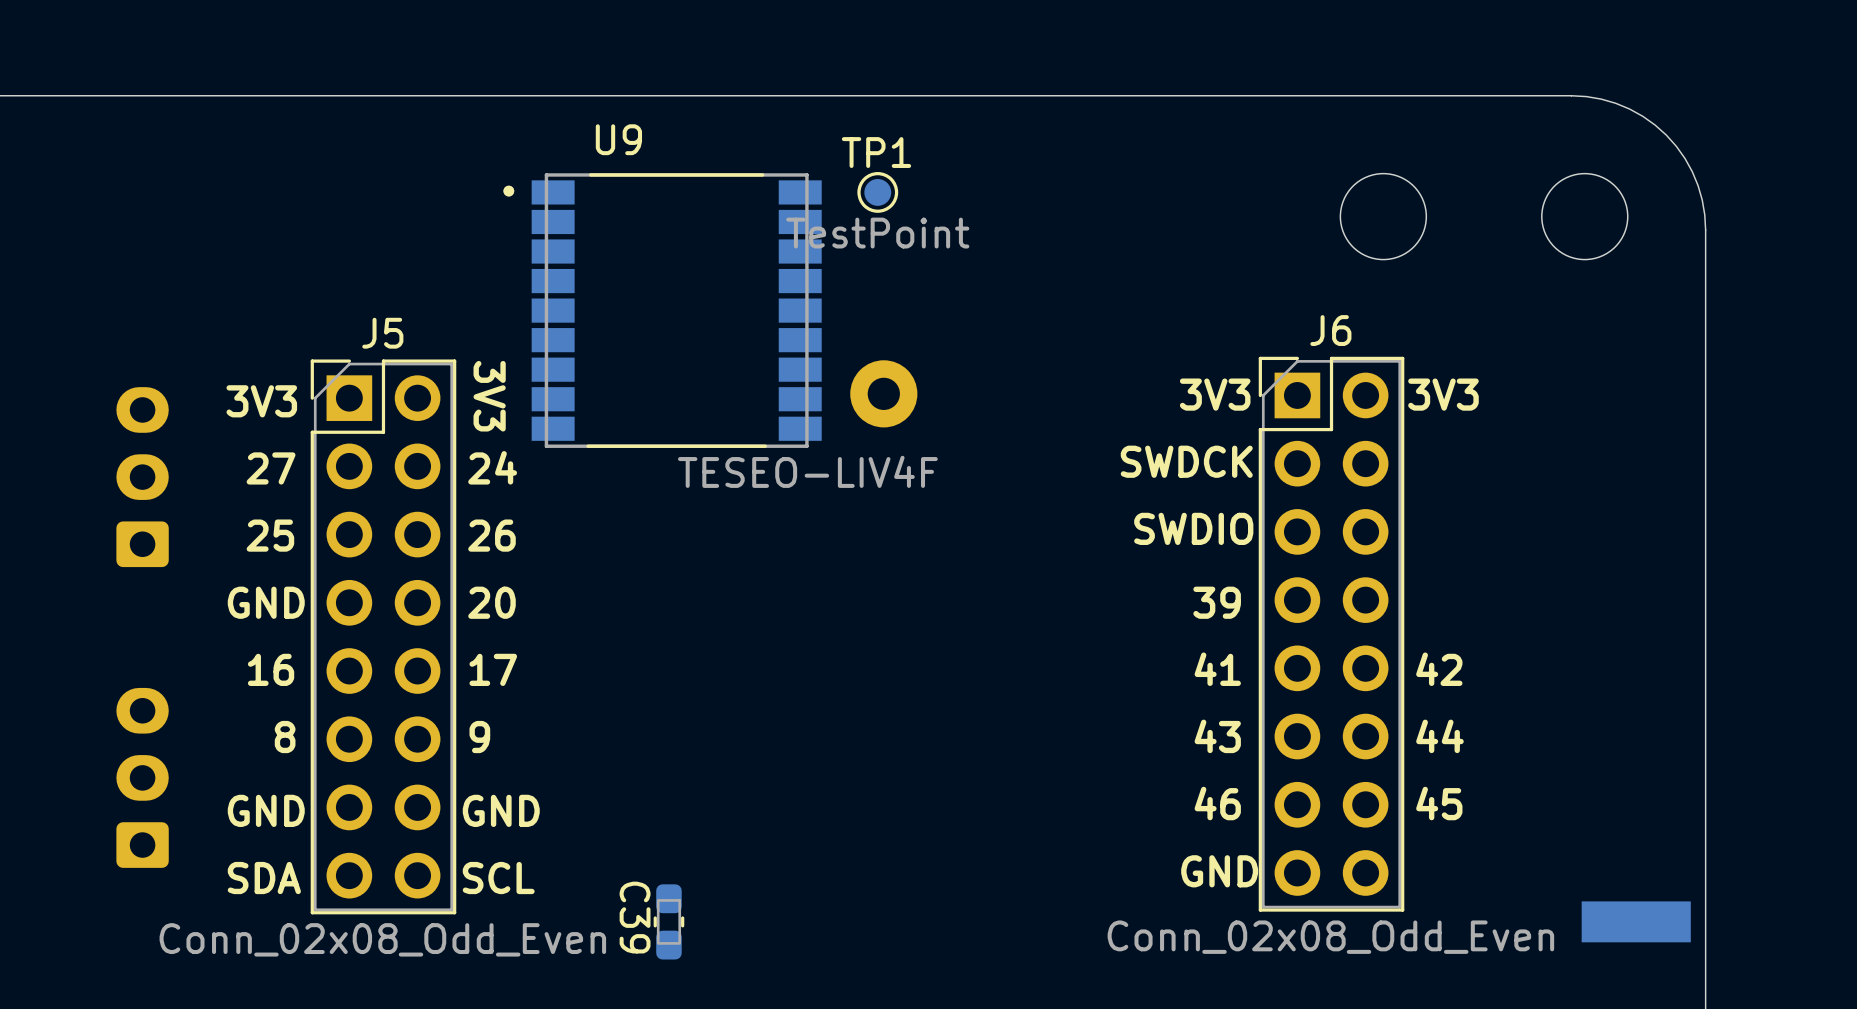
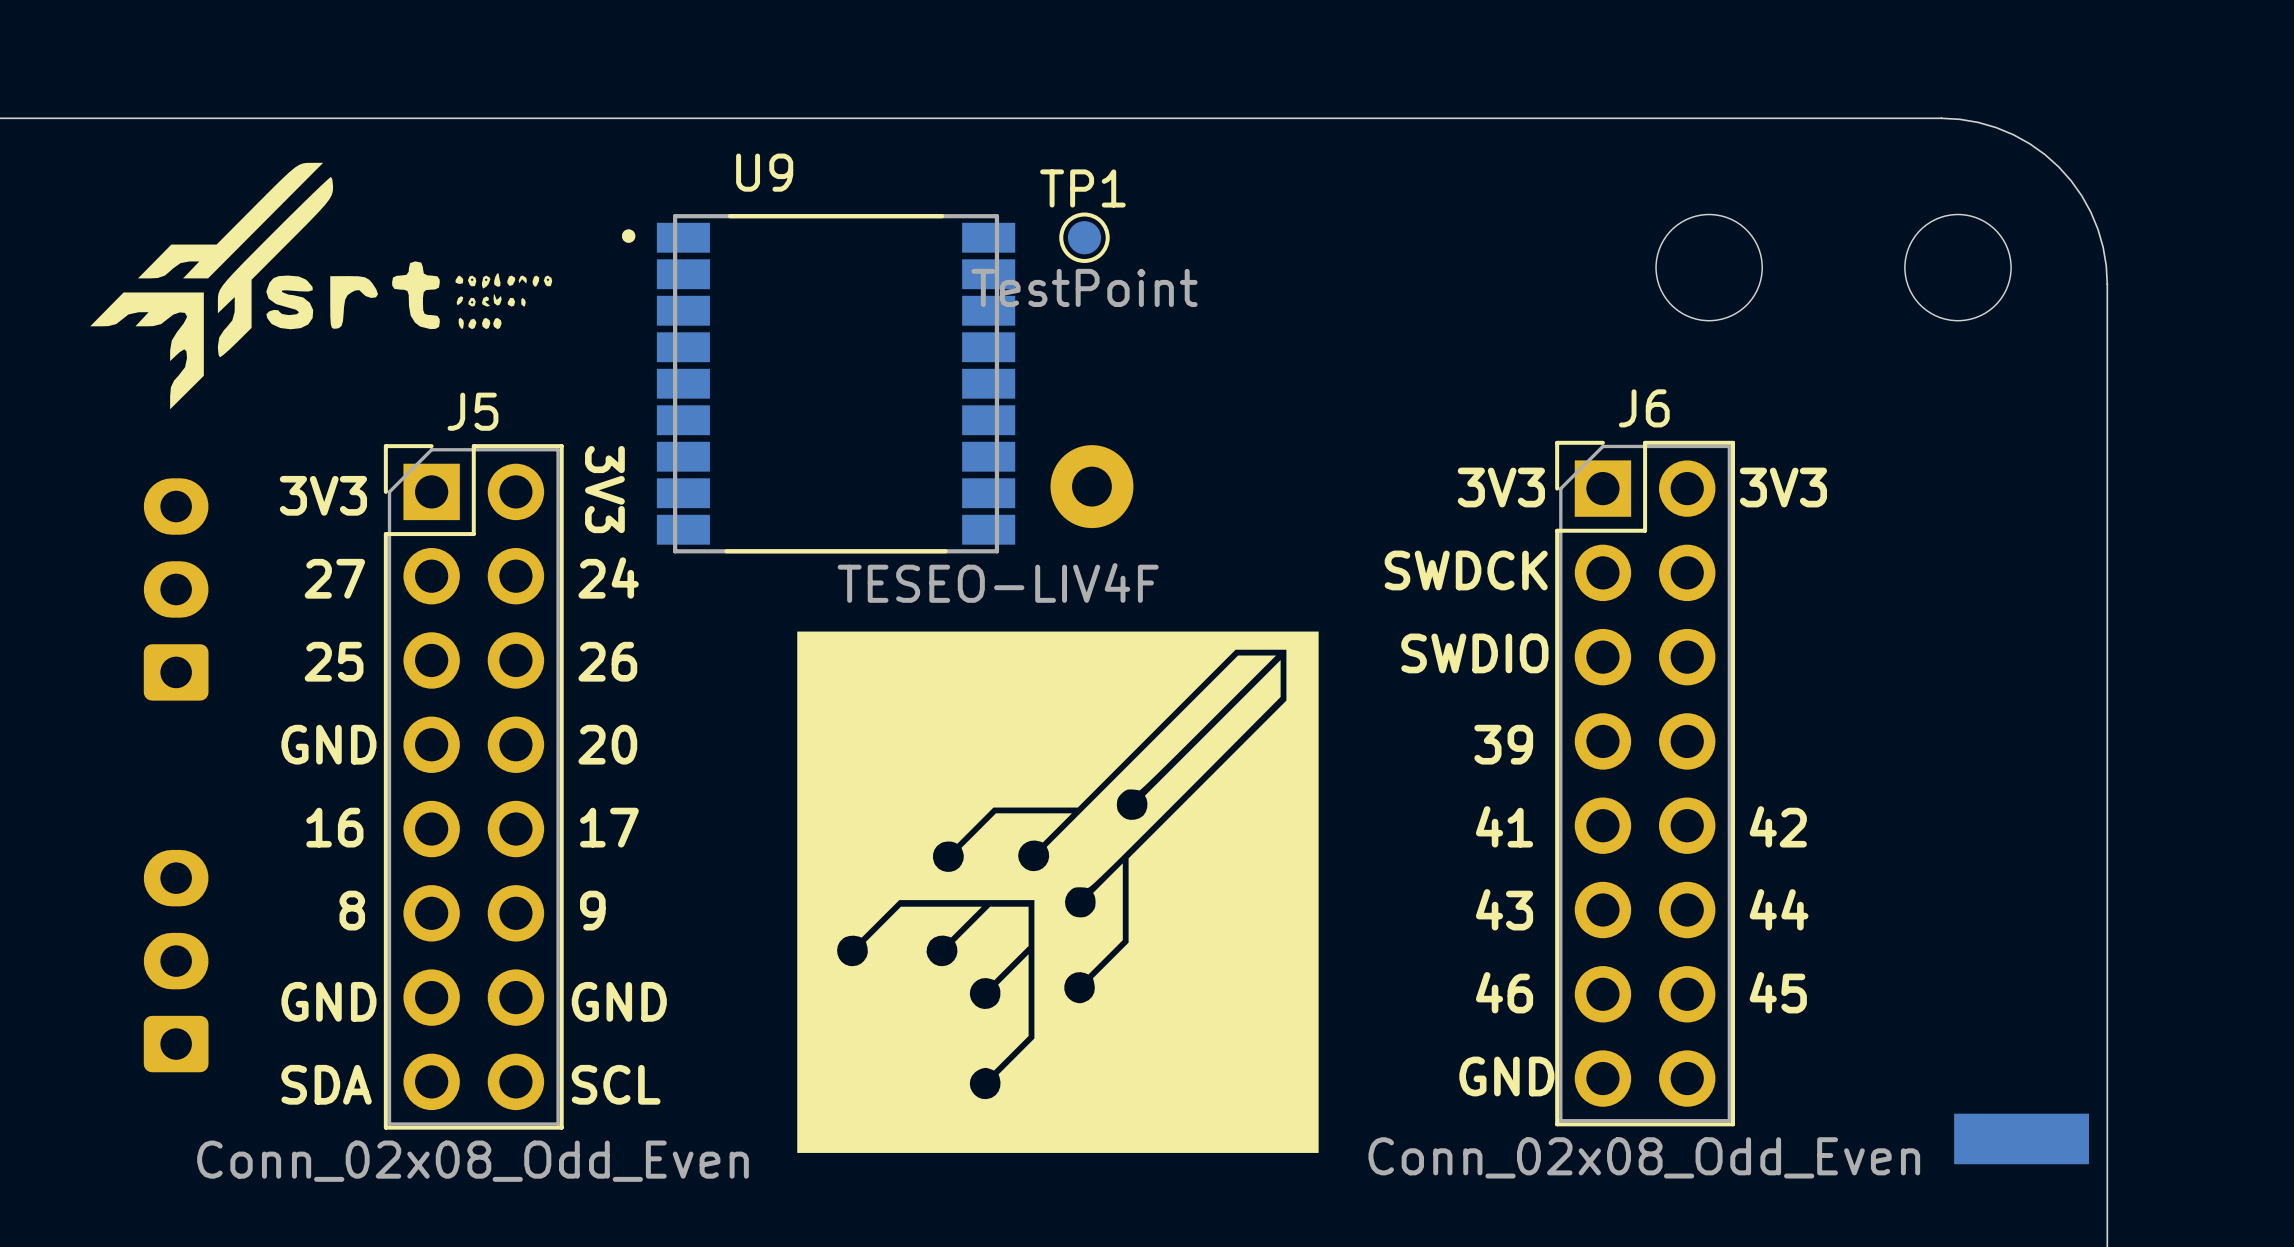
drawing: none -> [90, 162, 553, 410]
drawing: none -> [797, 631, 1319, 1153]
C39: (668, 921) -> none

